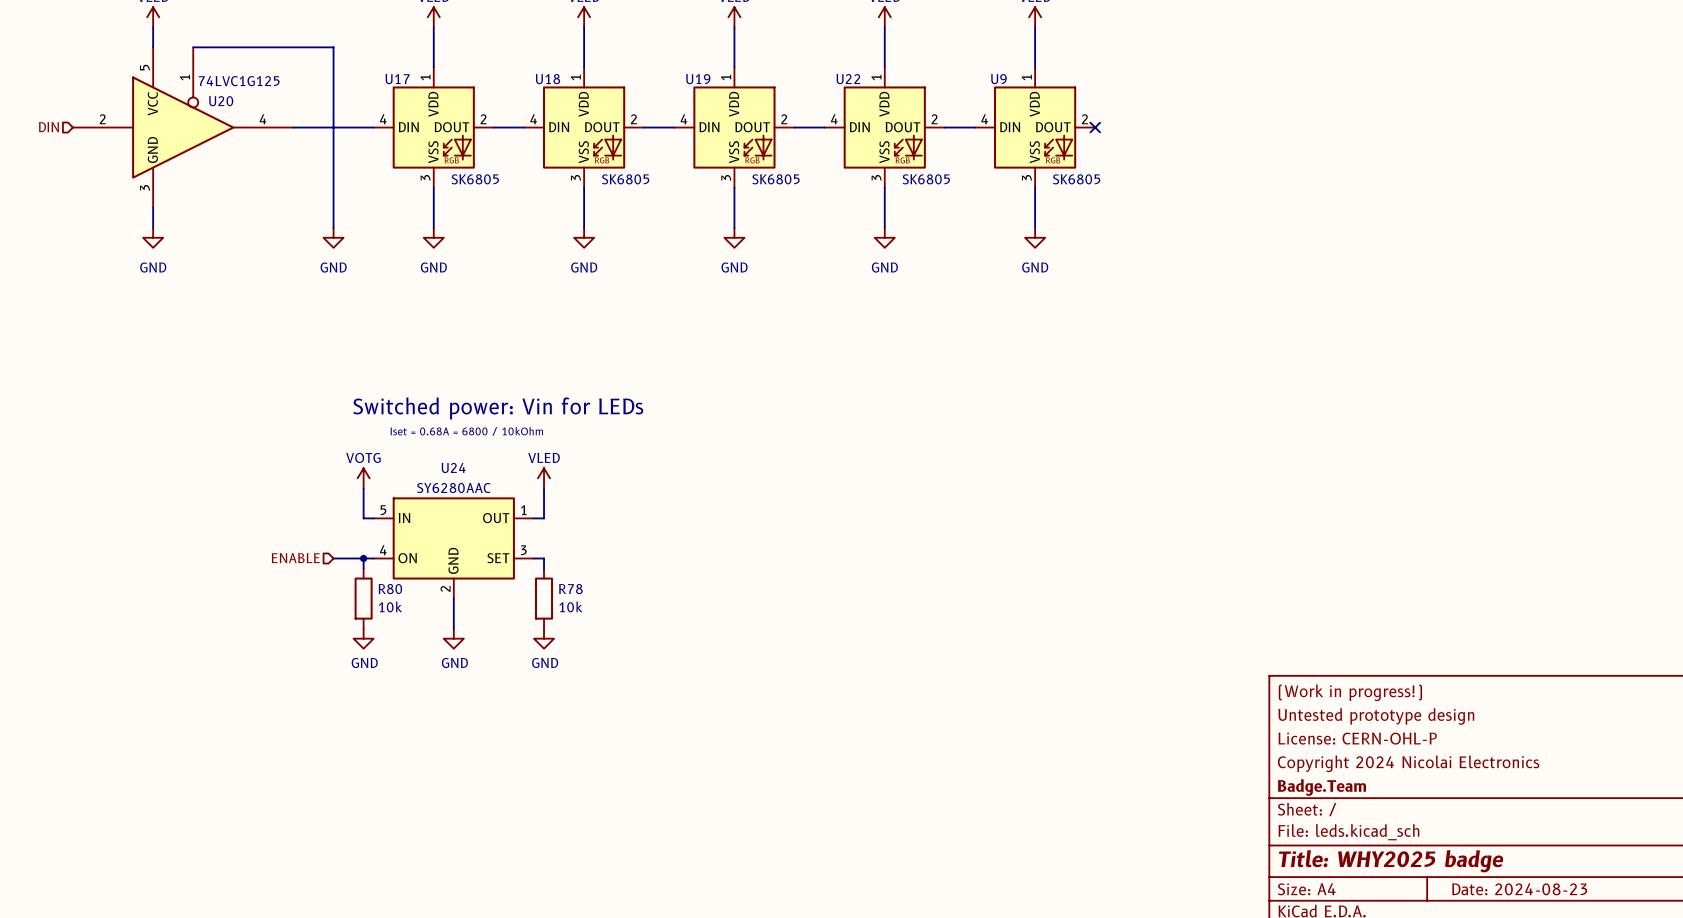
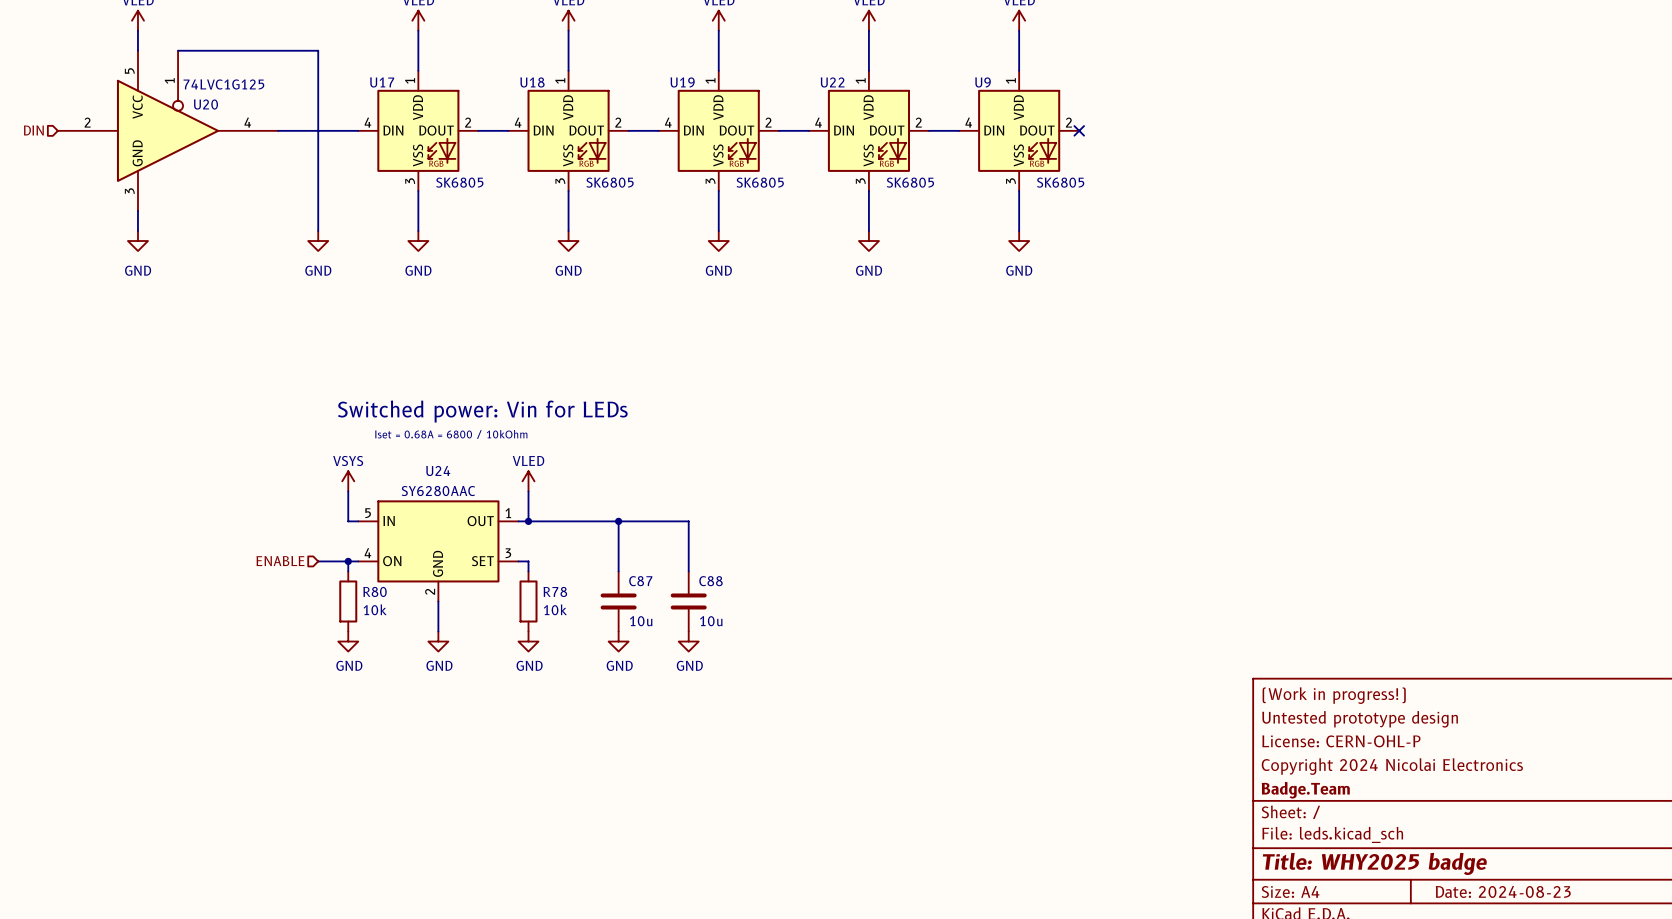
power symbol: VOTG (363, 478) -> VSYS (348, 481)
wire: none -> (528, 521) (688, 521) (688, 571)
junction: none -> (528, 521)
wire: none -> (618, 521) (618, 571)
junction: none -> (618, 521)
C87: none -> 10u (618, 601)
C88: none -> 10u (688, 601)
power symbol: none -> GND (618, 641)
power symbol: none -> GND (688, 641)

